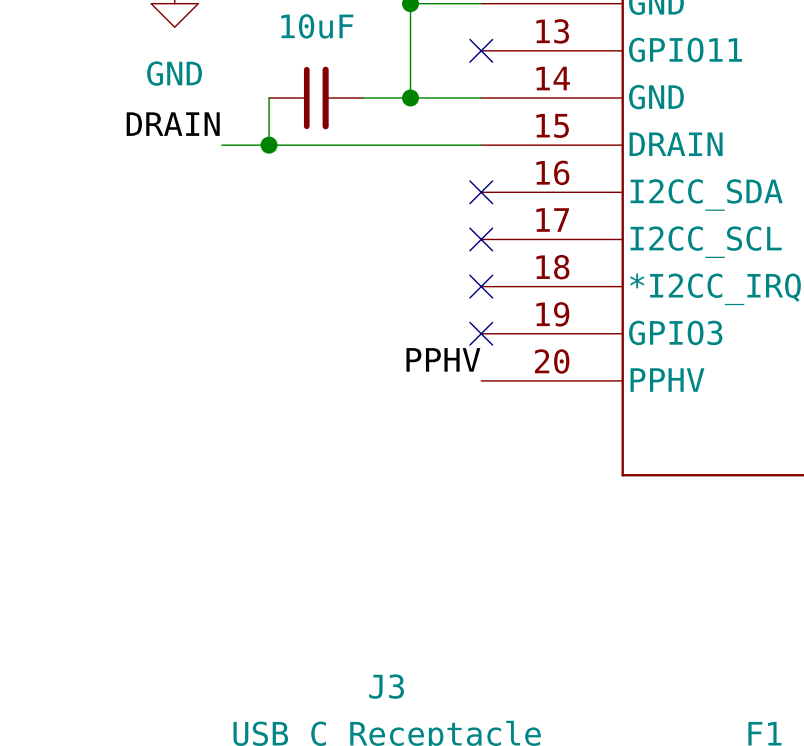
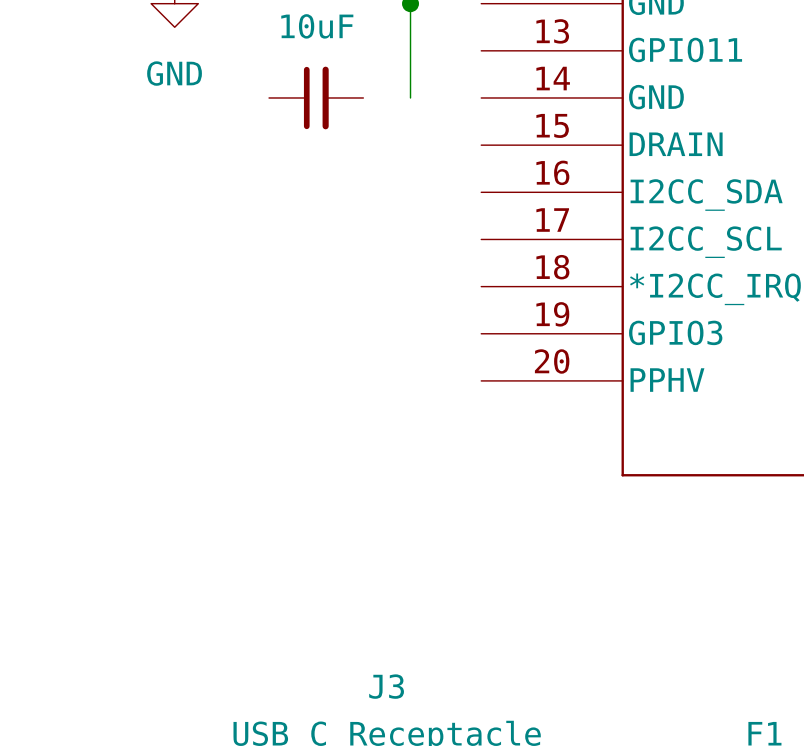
wire: (410, 3) (481, 3) -> none
no-connect mark: (481, 50) -> none
wire: (269, 97) (269, 145) -> none
wire: (363, 97) (481, 97) -> none
junction: (410, 97) -> none
label: DRAIN (173, 124) -> none
wire: (221, 145) (481, 145) -> none
junction: (269, 145) -> none
no-connect mark: (481, 192) -> none
no-connect mark: (481, 239) -> none
no-connect mark: (481, 286) -> none
no-connect mark: (481, 333) -> none
label: PPHV (443, 359) -> none

